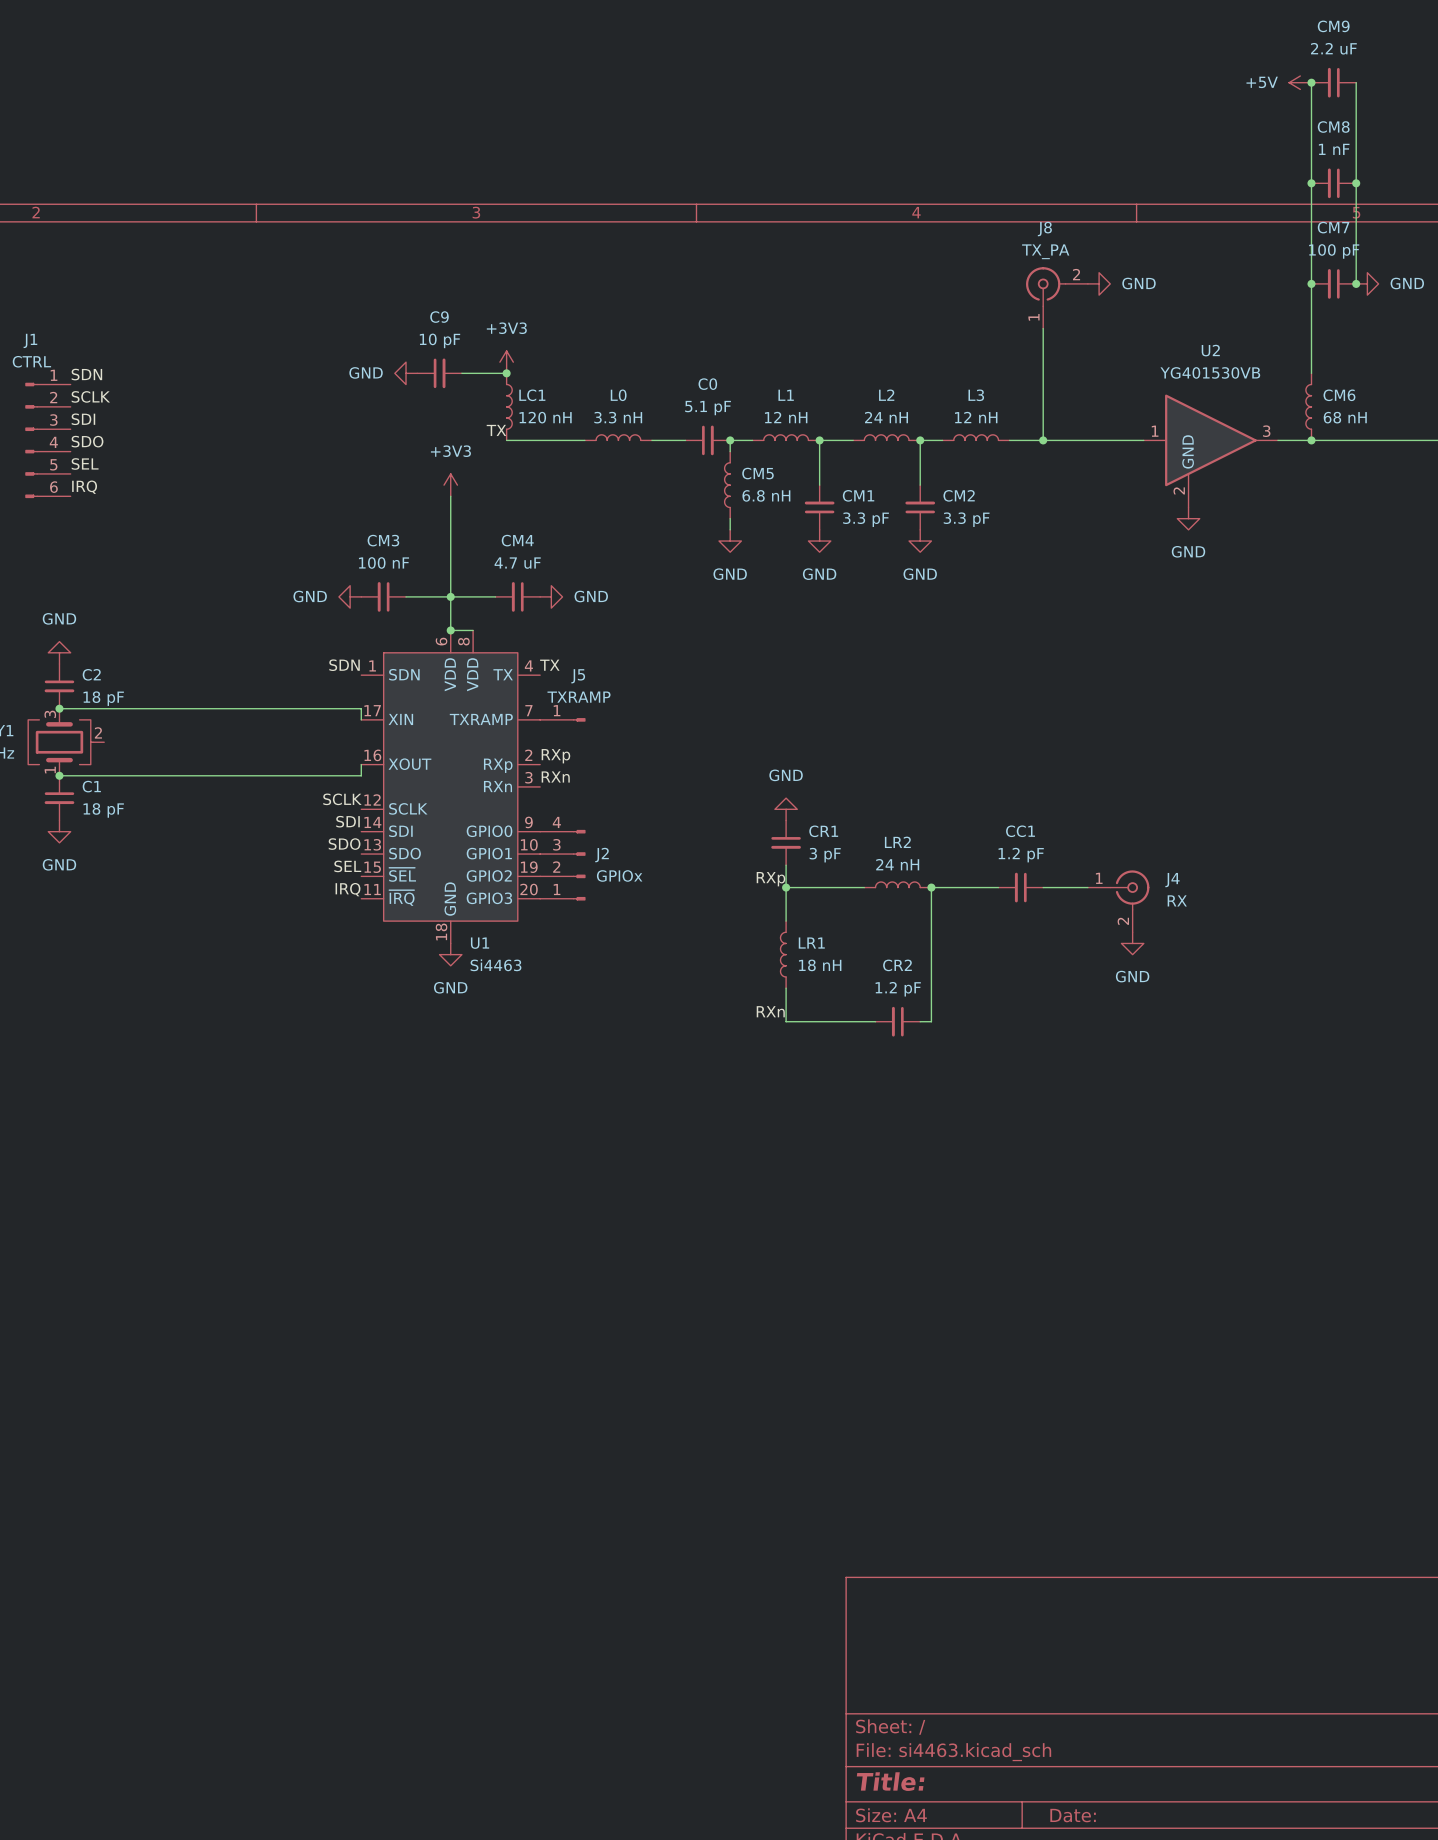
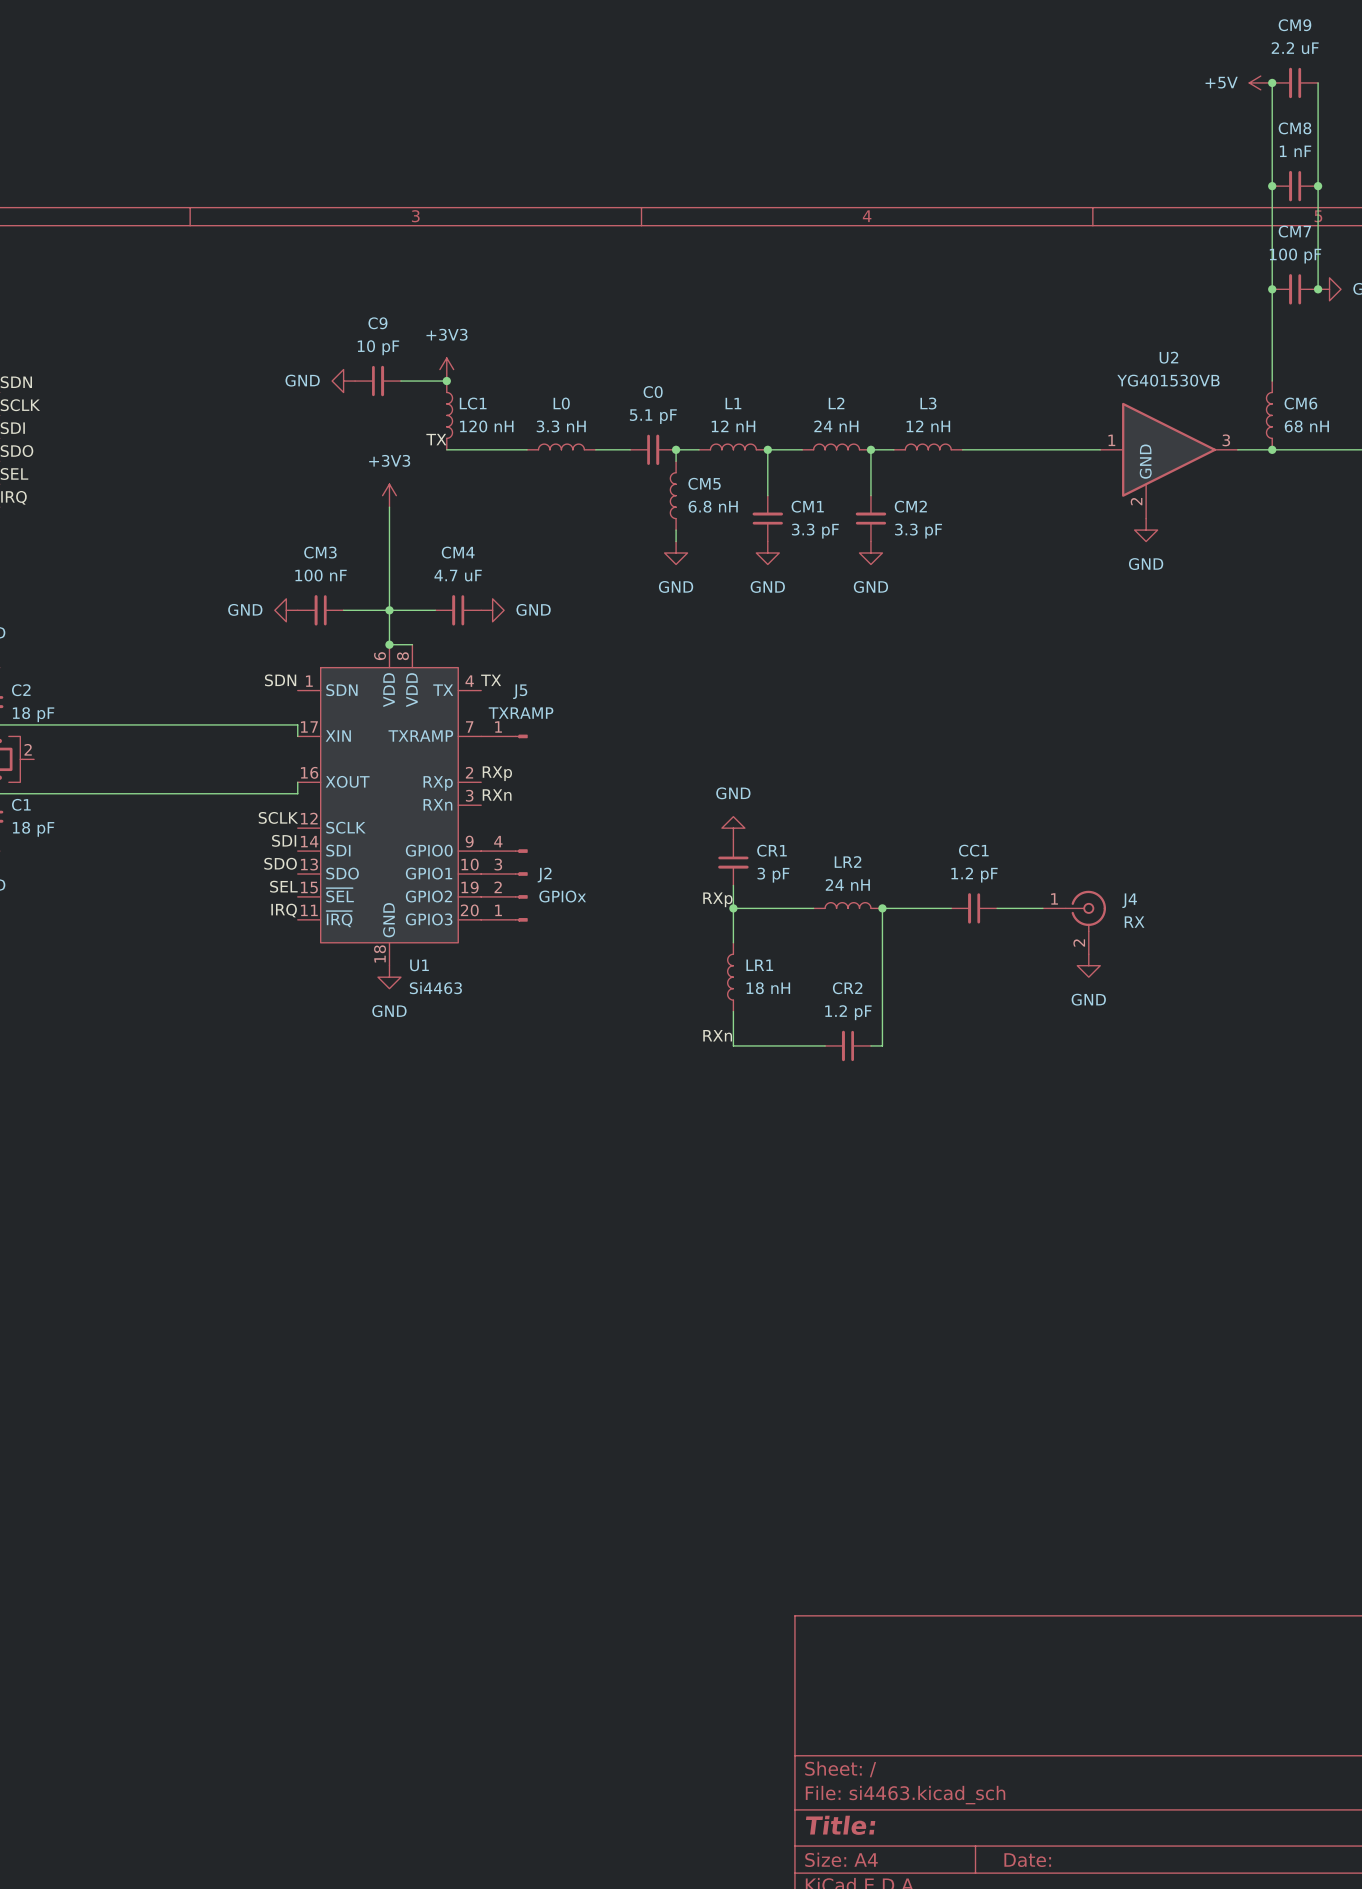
power symbol: GND (1099, 283) -> none
J8: TX_PA (1056, 297) -> none
wire: (1043, 328) (1043, 440) -> none
junction: (1043, 440) -> none

